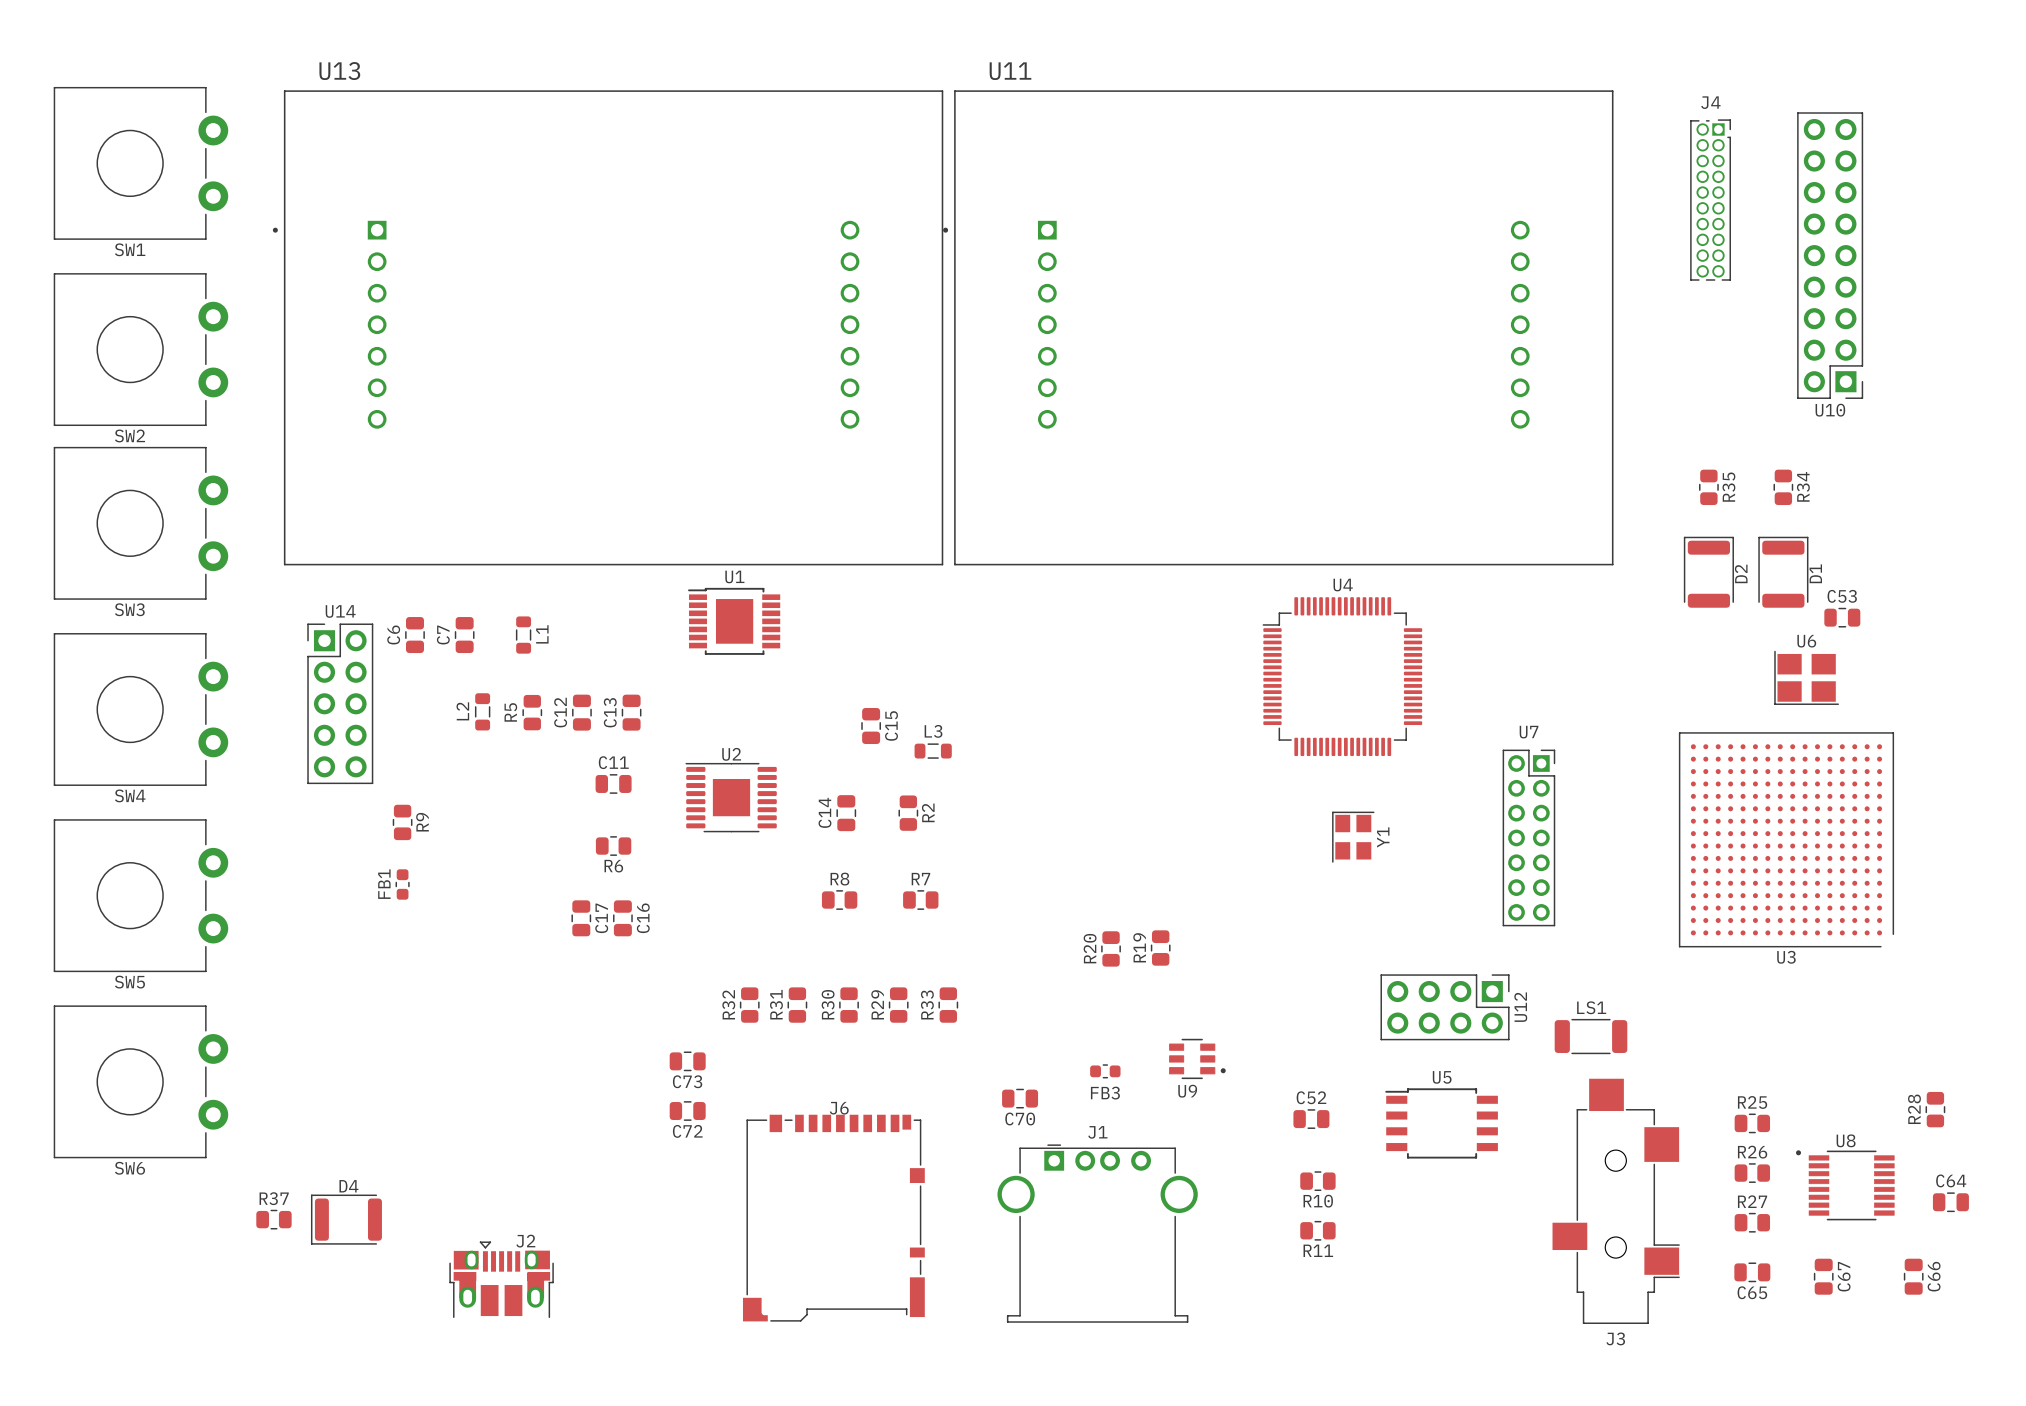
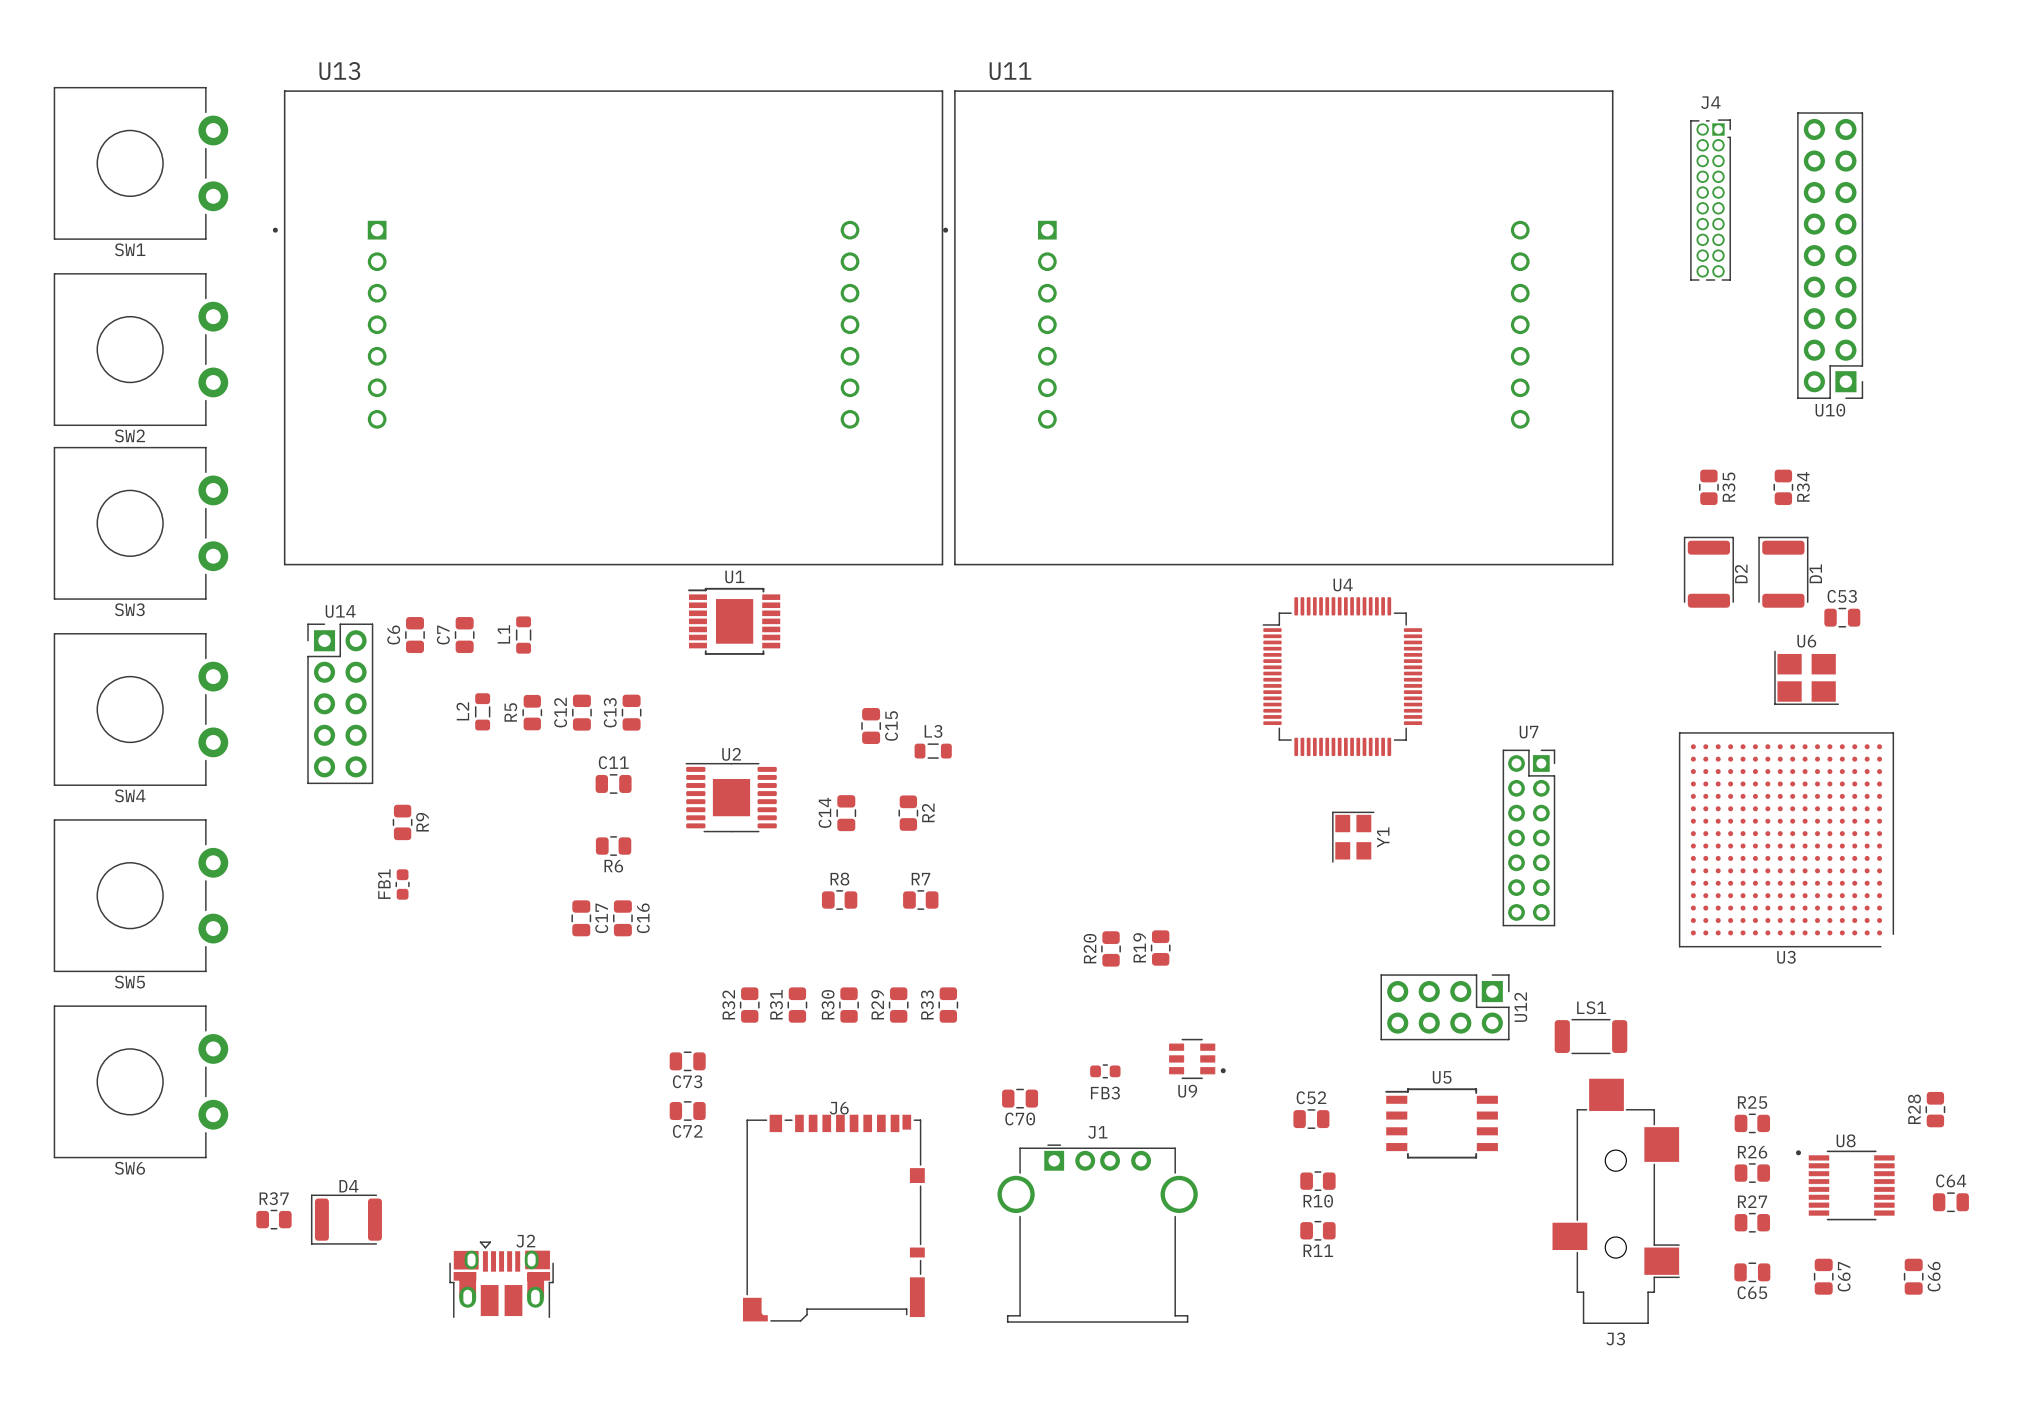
L1 name position: L1 (542, 634) -> L1 (503, 634)

